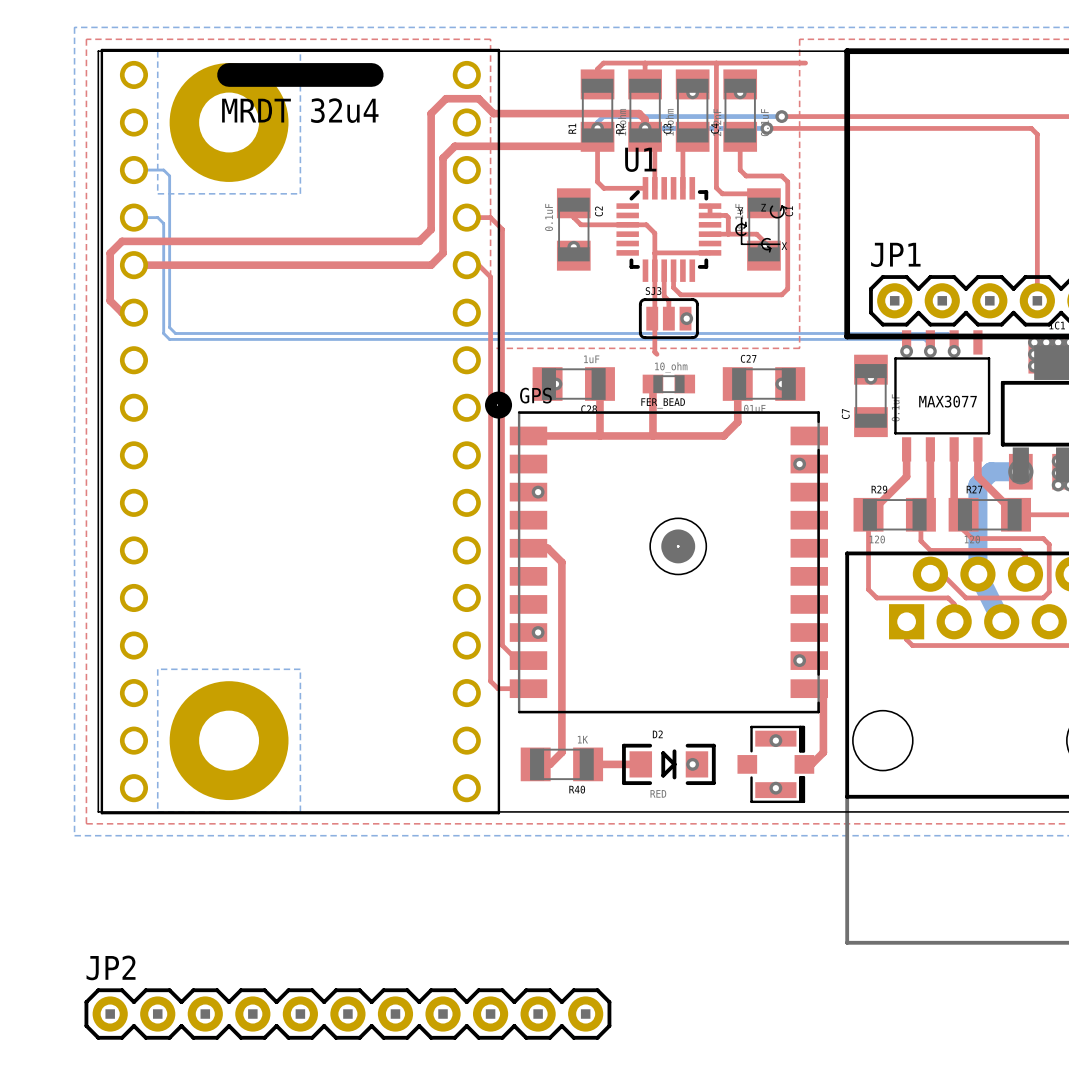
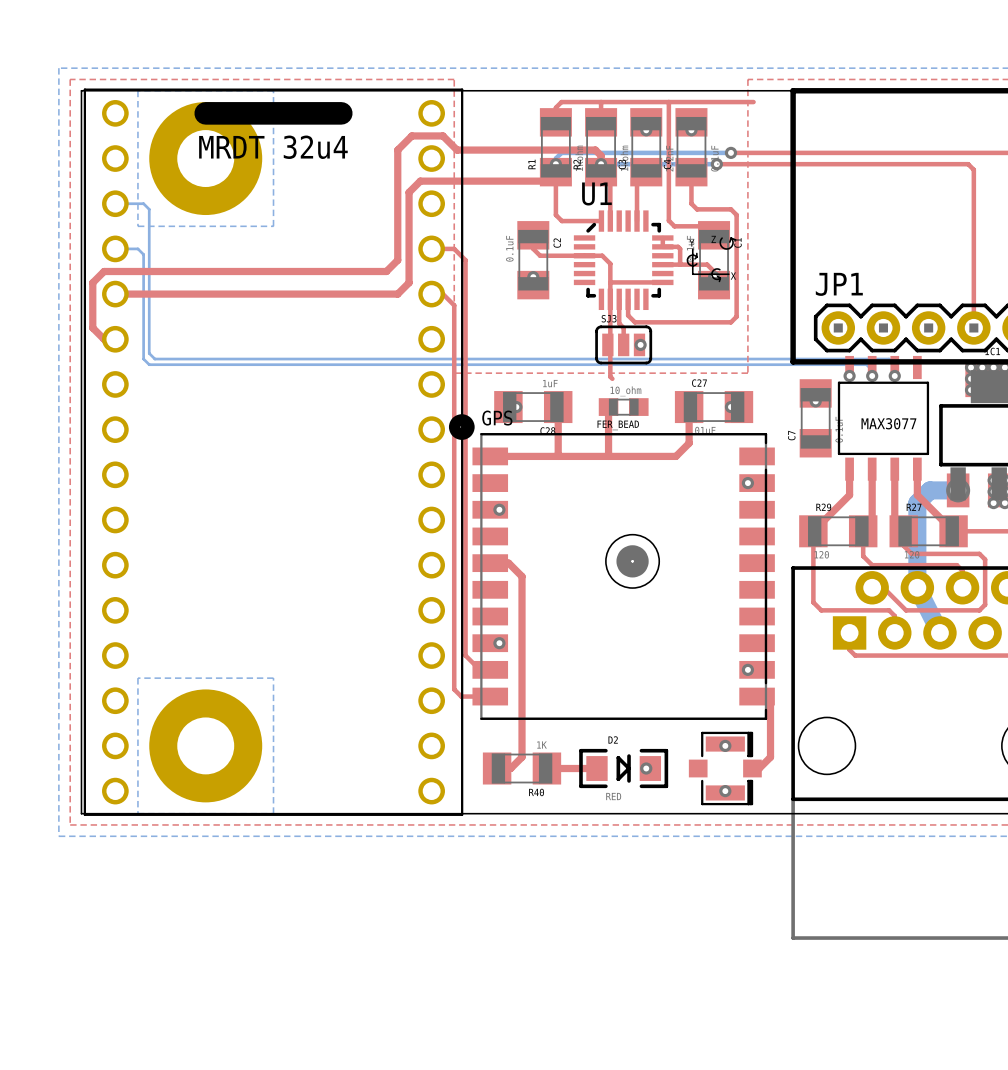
JP2: (347, 1014) -> none

